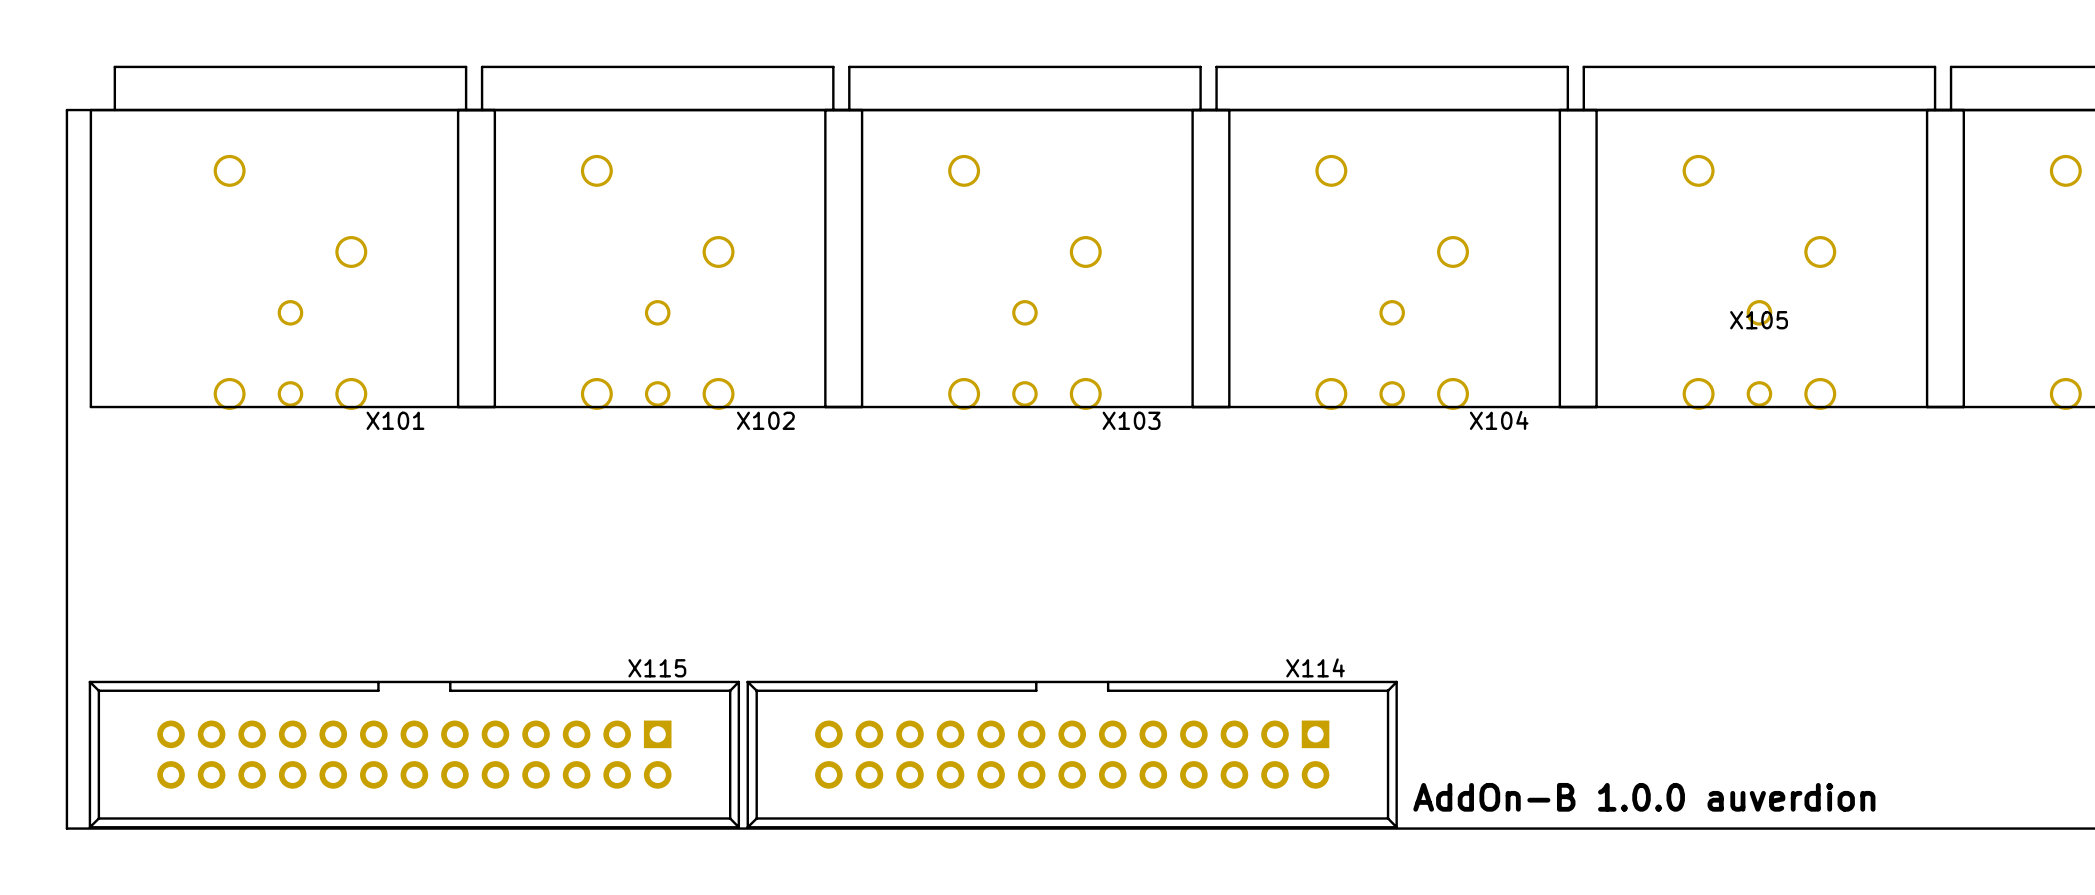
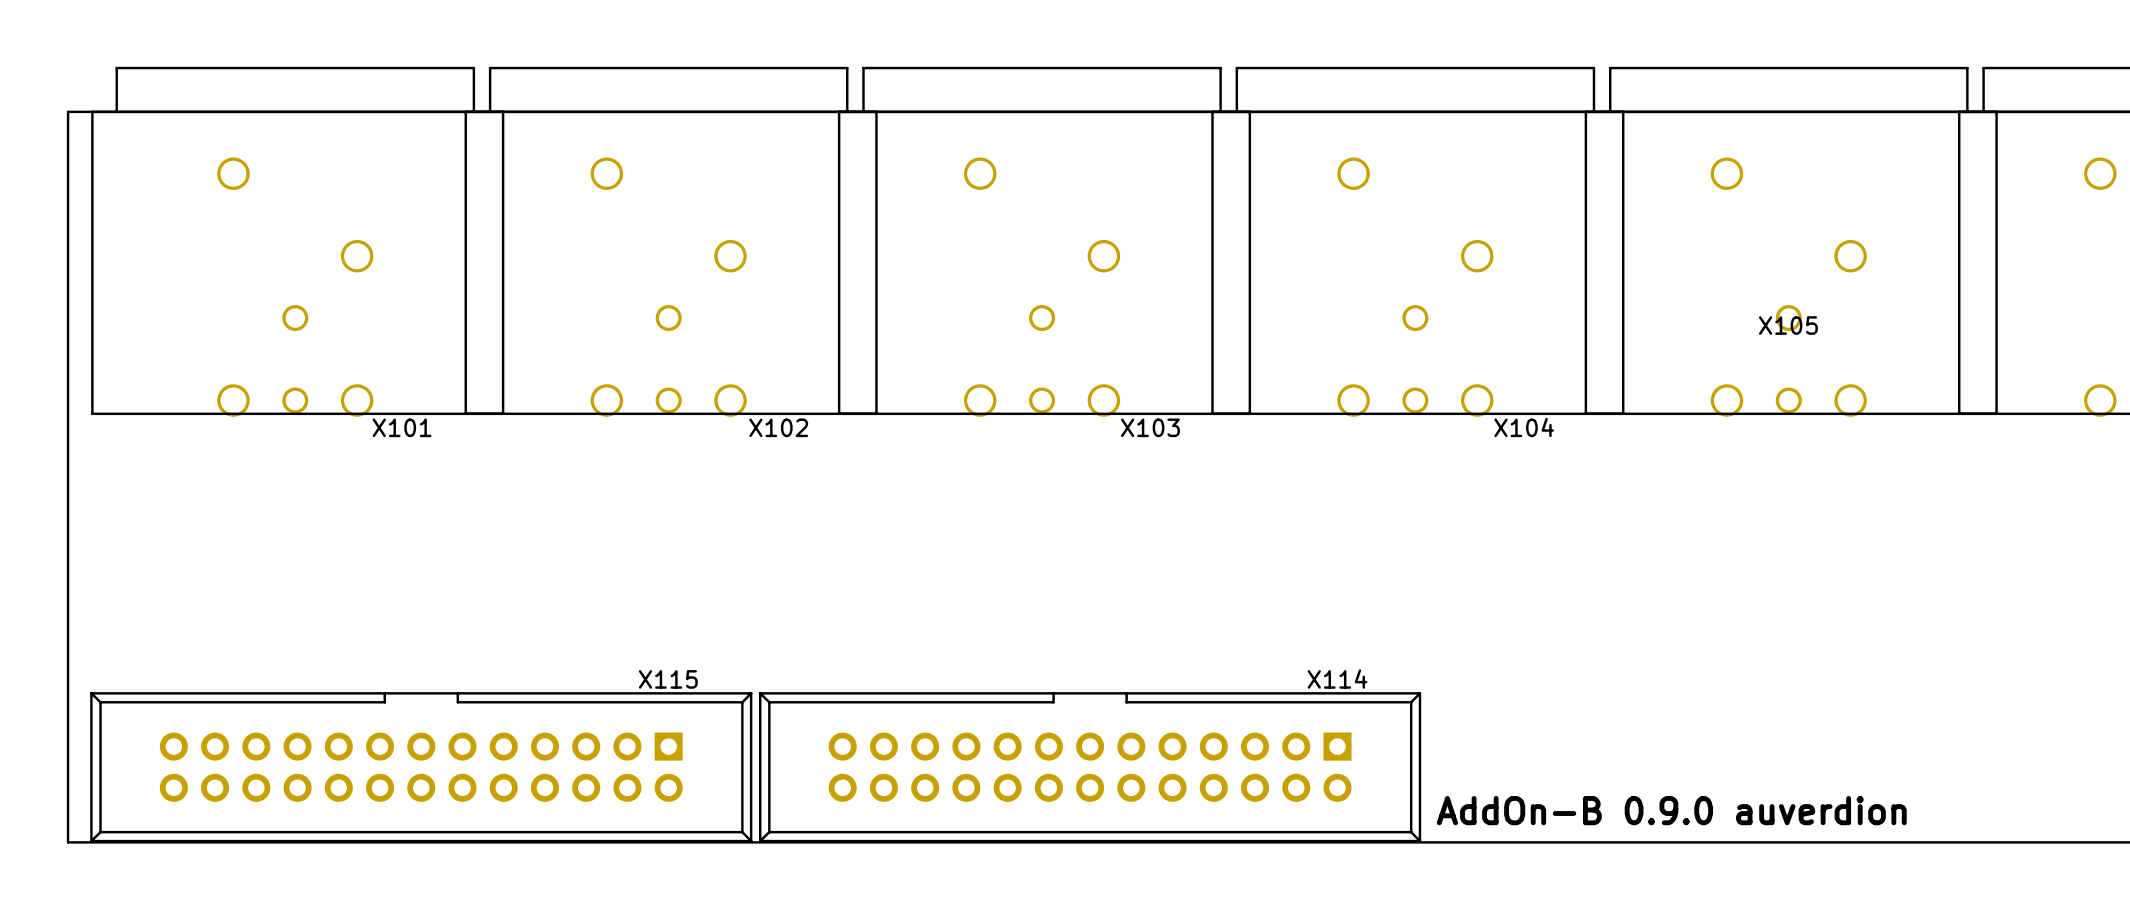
text: AddOn-B 1.0.0 auverdion (1644, 797) -> AddOn-B 0.9.0 auverdion (1671, 810)

